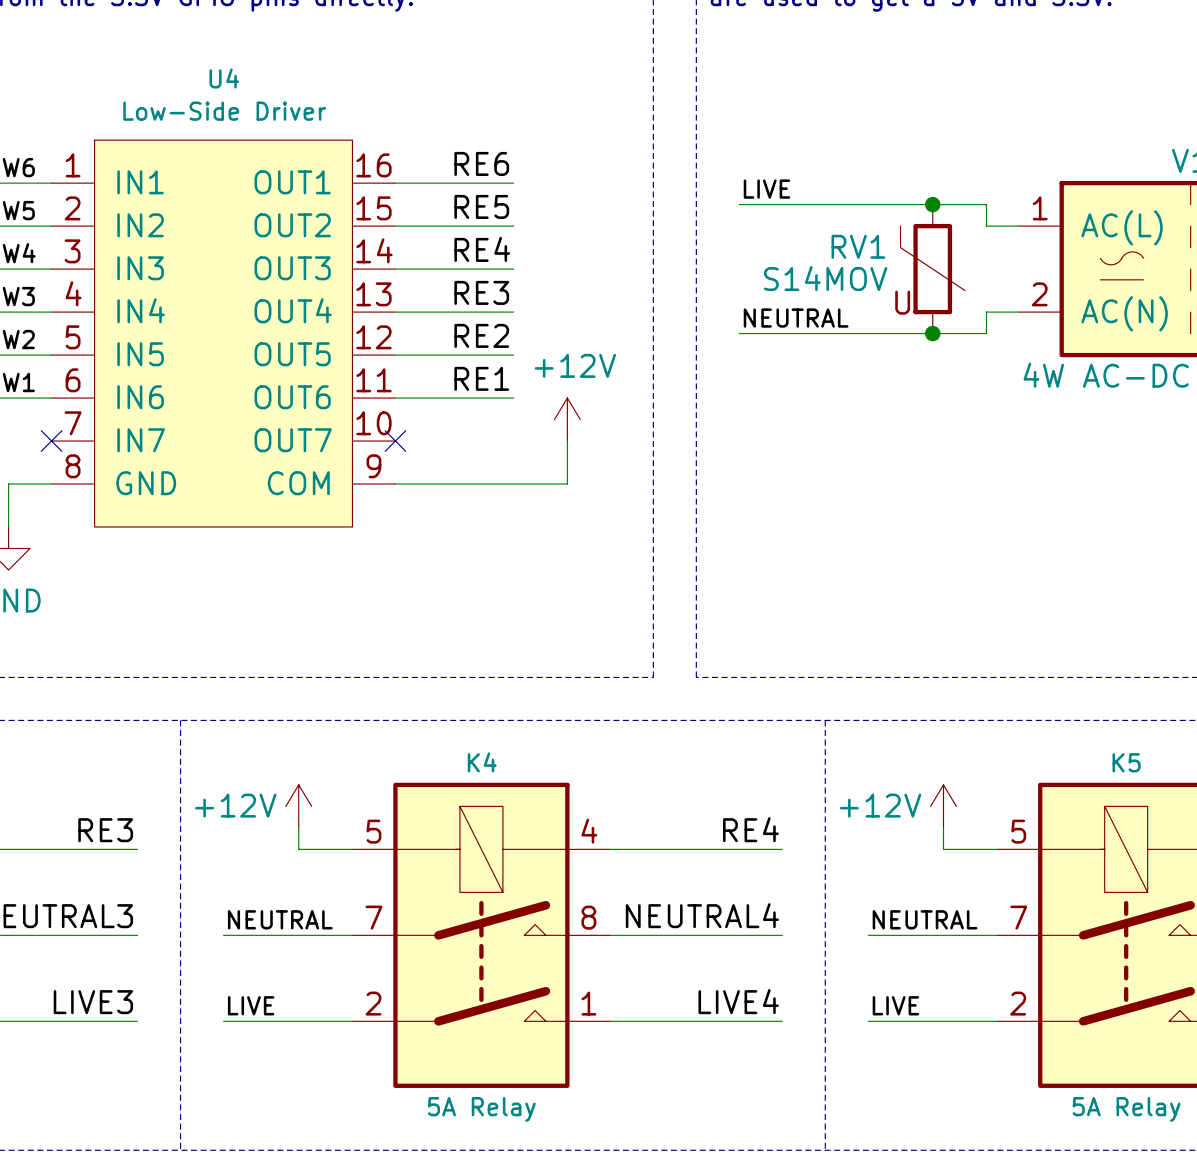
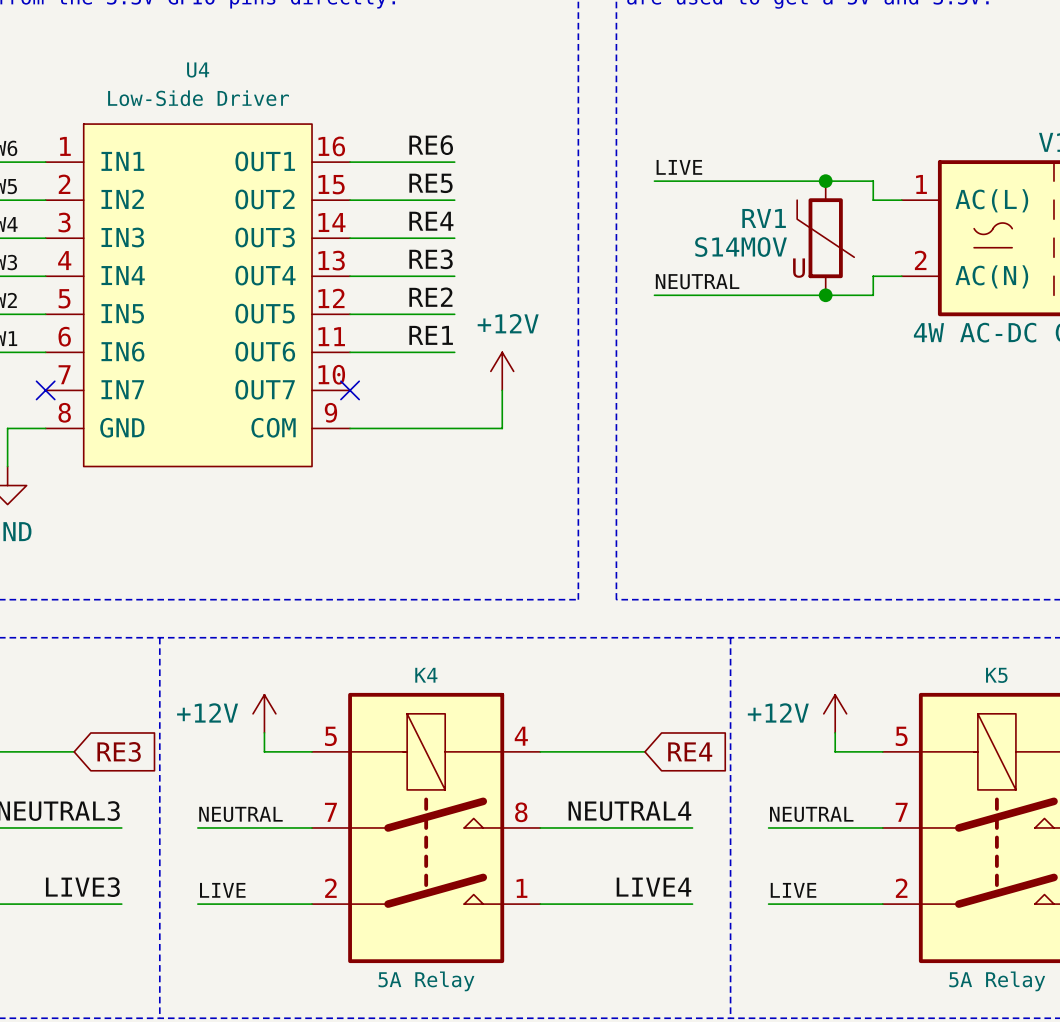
label: RE4 (750, 829) -> none
label: RE3 (105, 830) -> none
global label: none -> RE4 (690, 751)
wire: (83, 849) (137, 849) -> none
global label: none -> RE3 (119, 751)
wire: (728, 849) (782, 849) -> none

